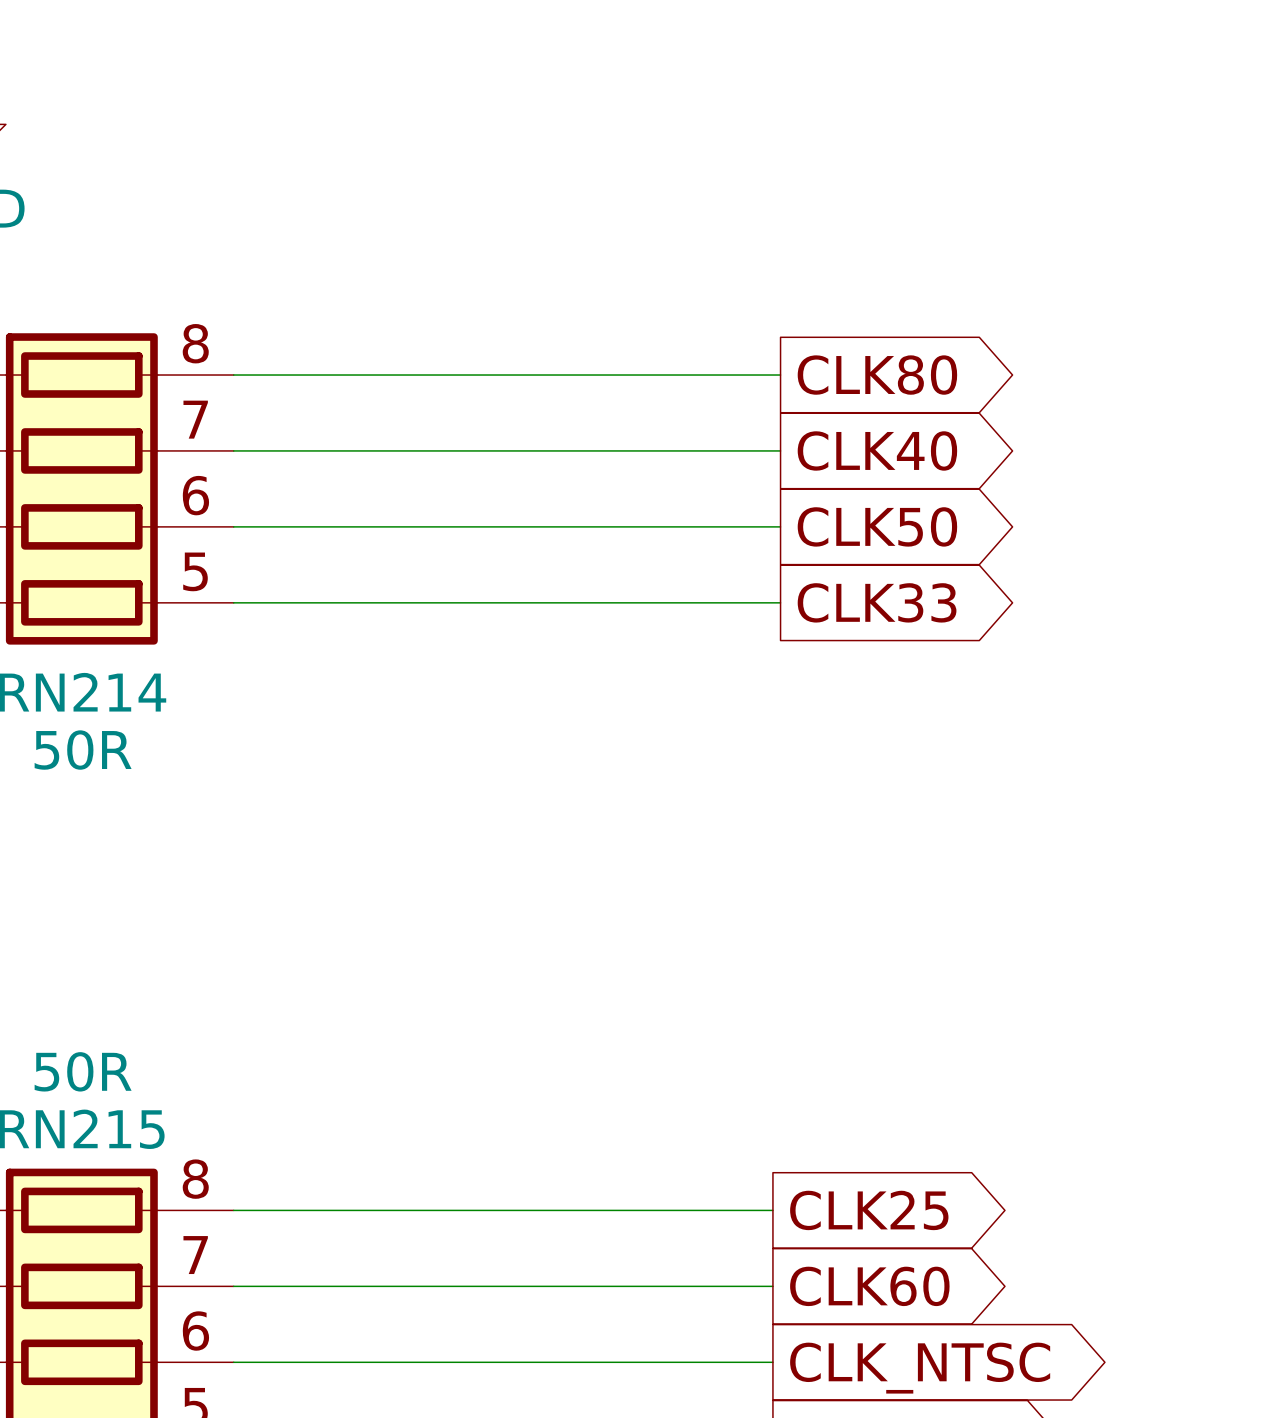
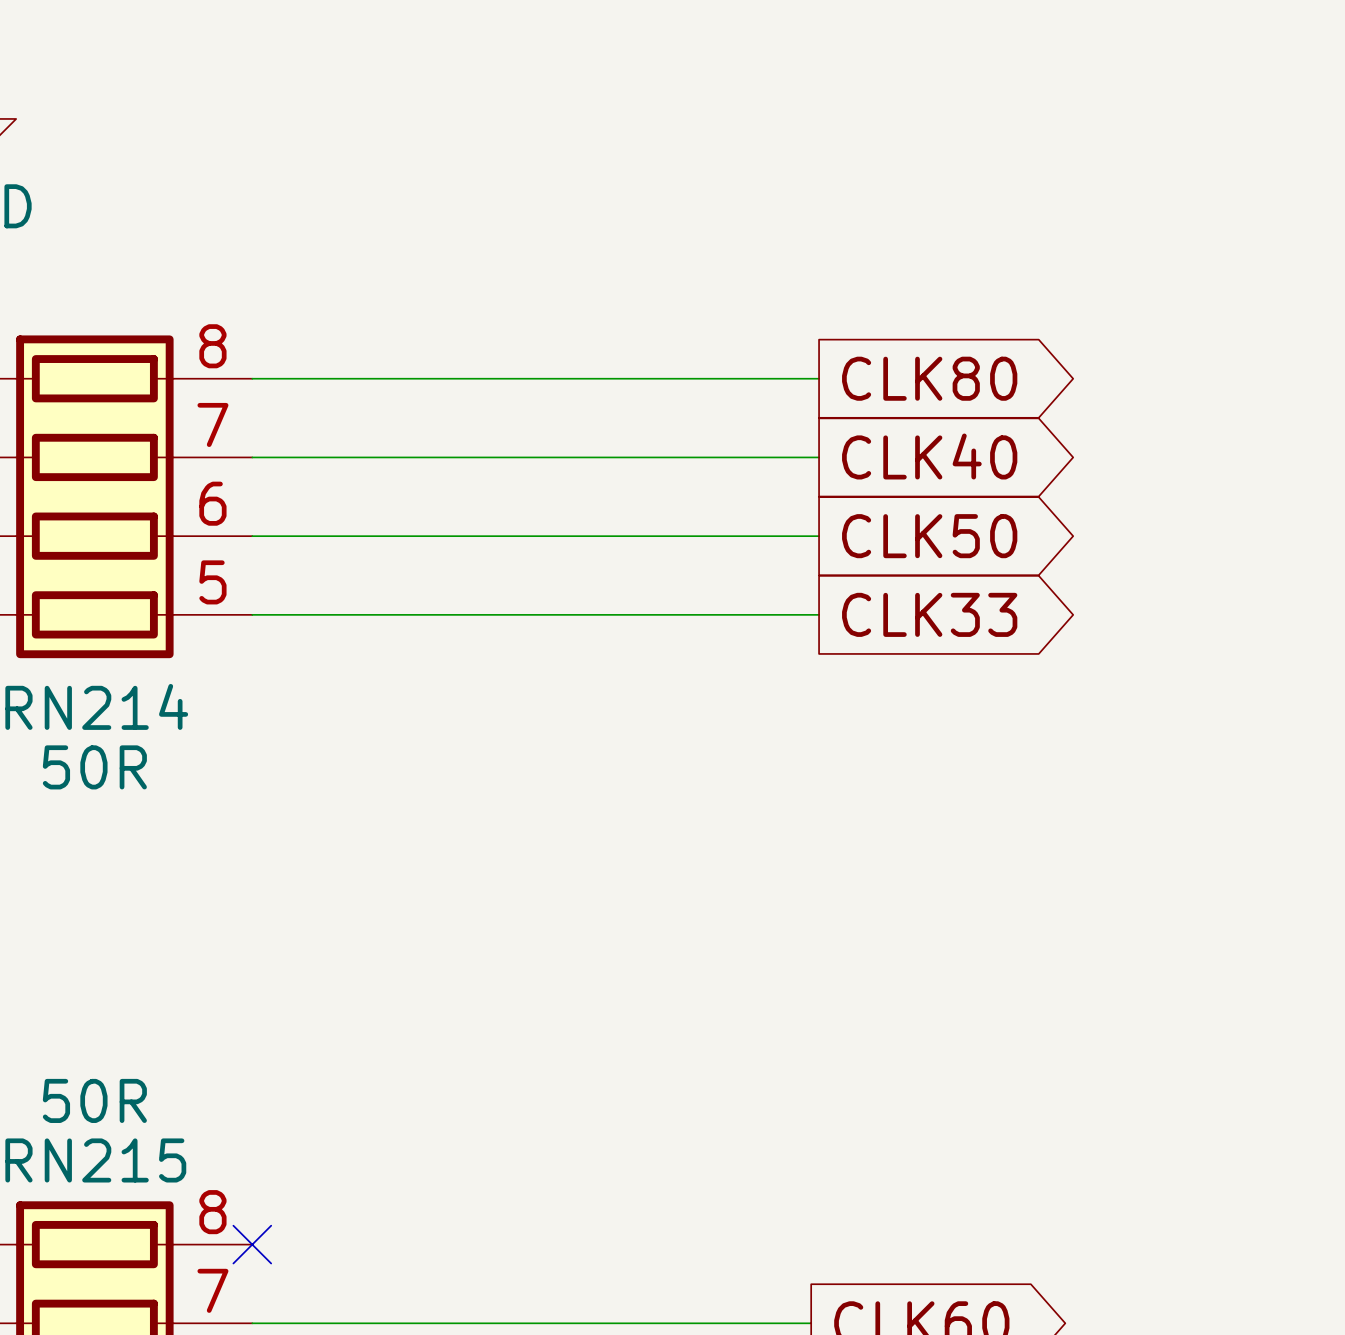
wire: (233, 1210) (772, 1210) -> none
no-connect mark: none -> (252, 1244)
global label: CLK25 (869, 1210) -> none

